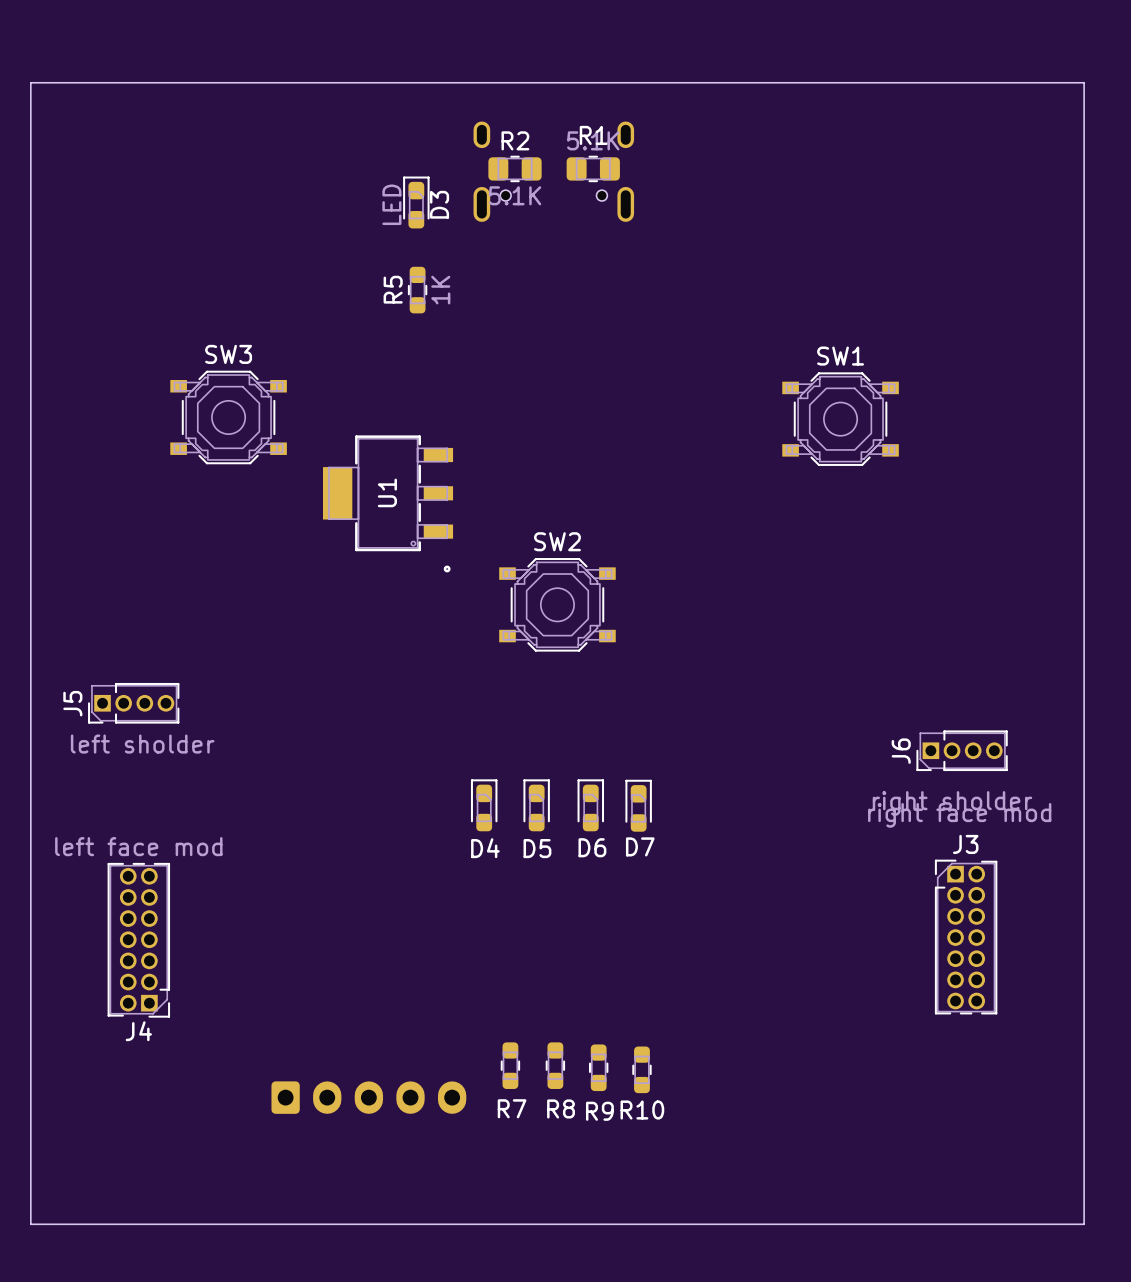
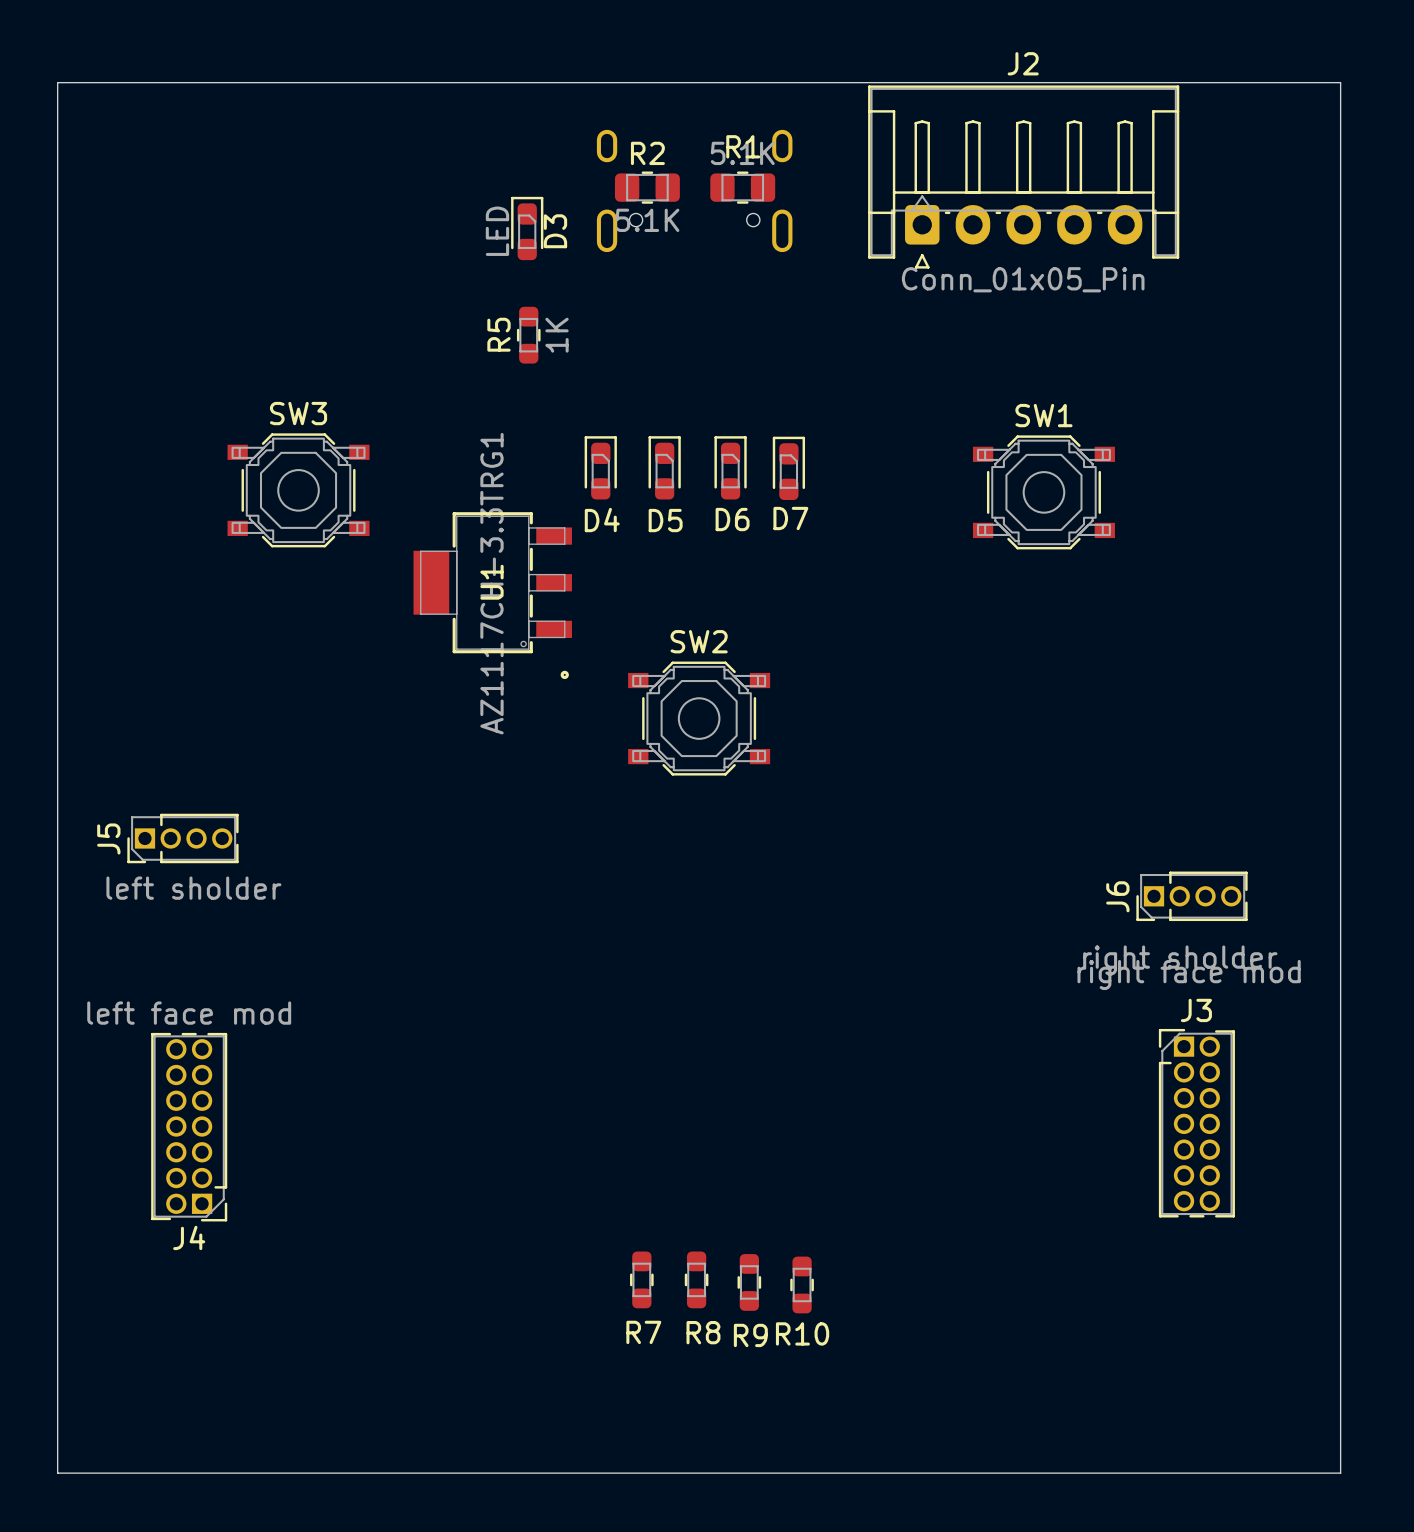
J2: none -> Conn_01x05_Pin (1023, 177)
U1 value: none -> AZ1117CH-3.3TRG1 (491, 583)
D4 position: (484, 805) -> (600, 467)
D5 position: (536, 805) -> (664, 467)
D6 position: (590, 805) -> (730, 467)
D7 position: (638, 805) -> (788, 468)
part: (368, 1097) -> none

